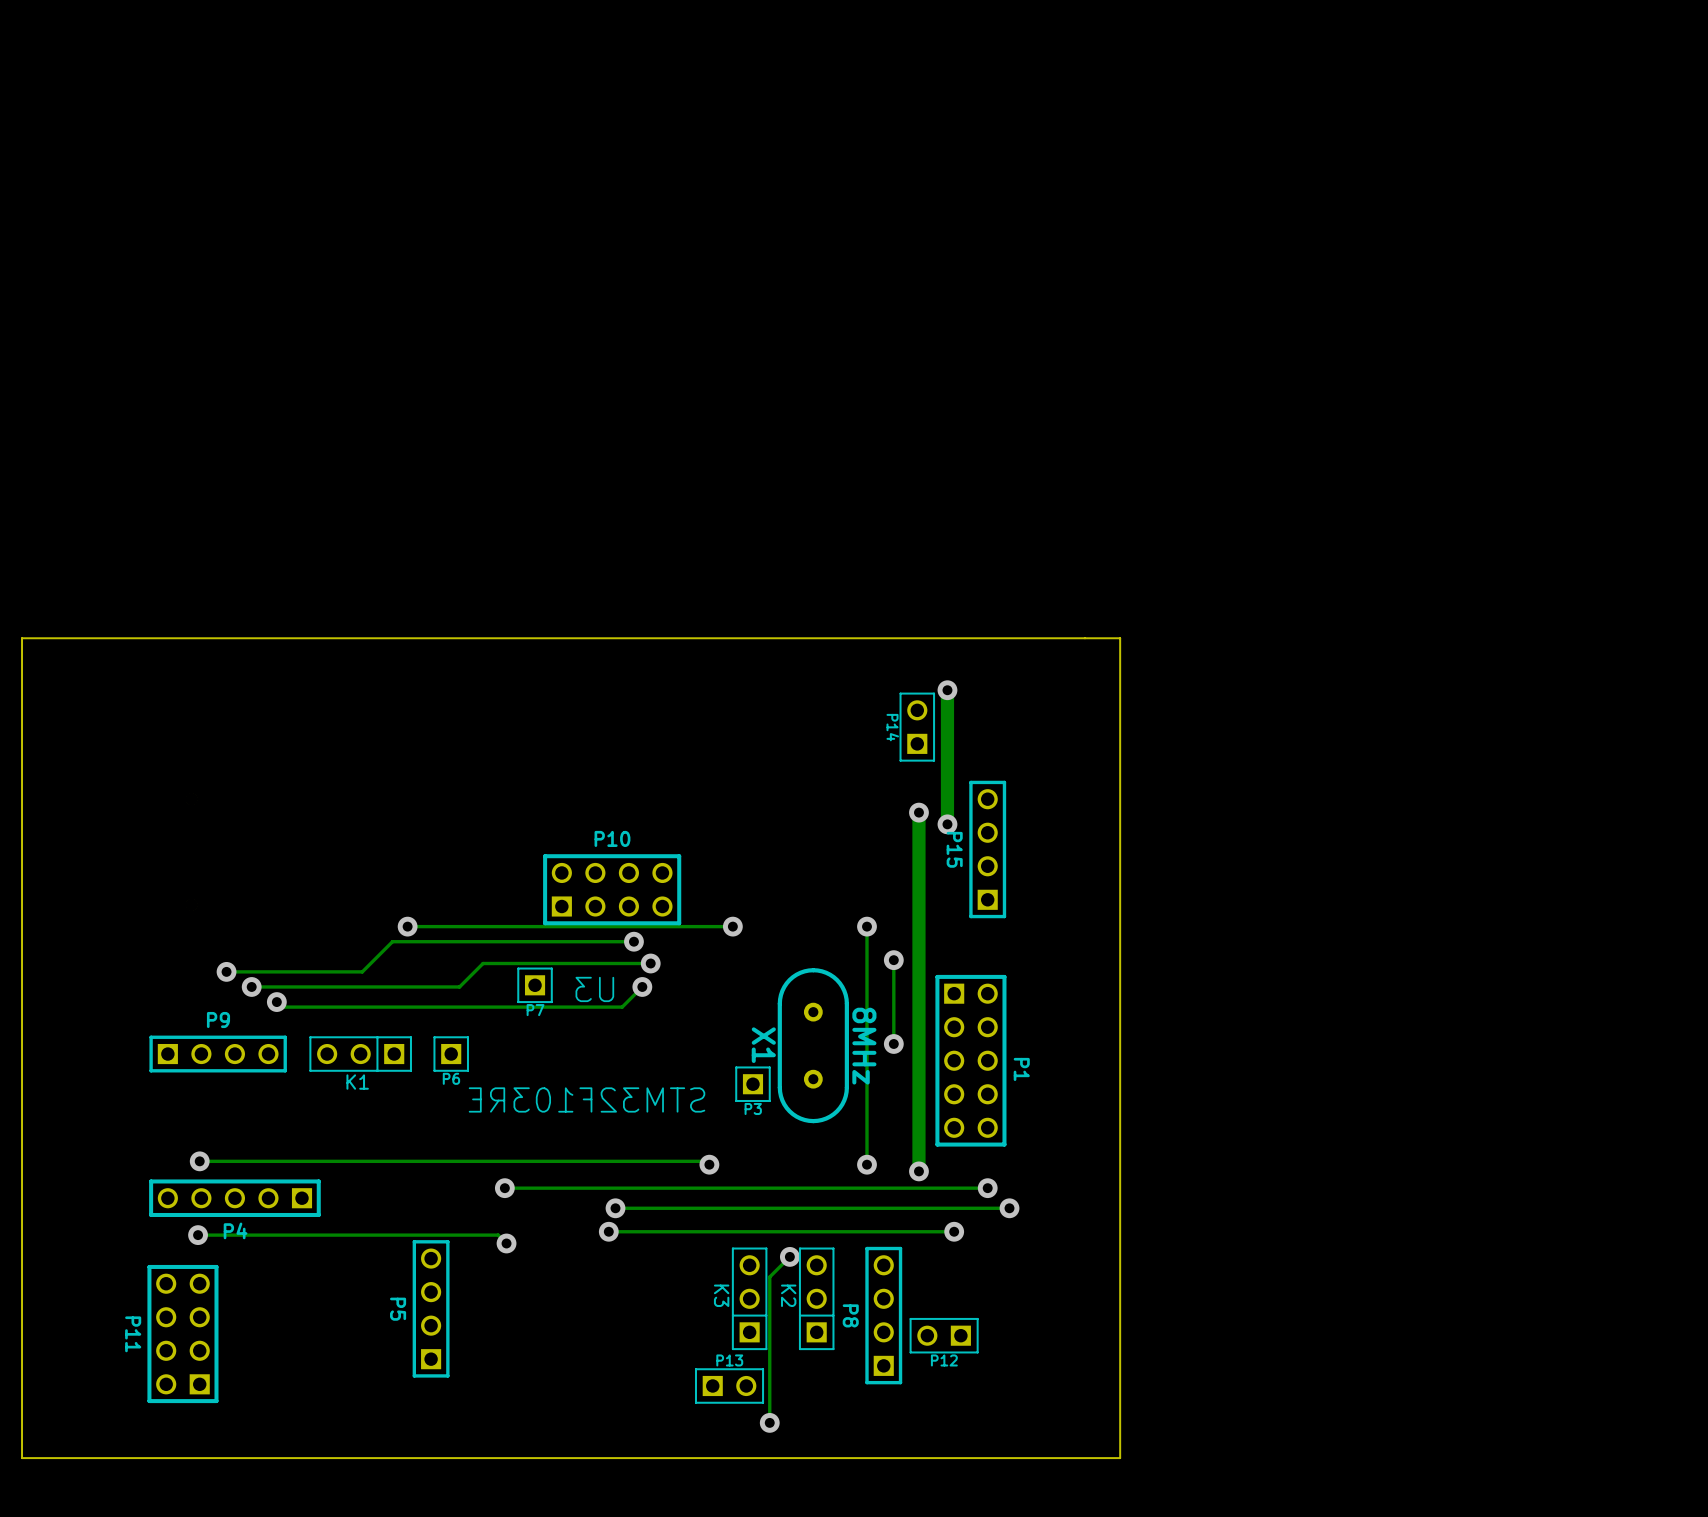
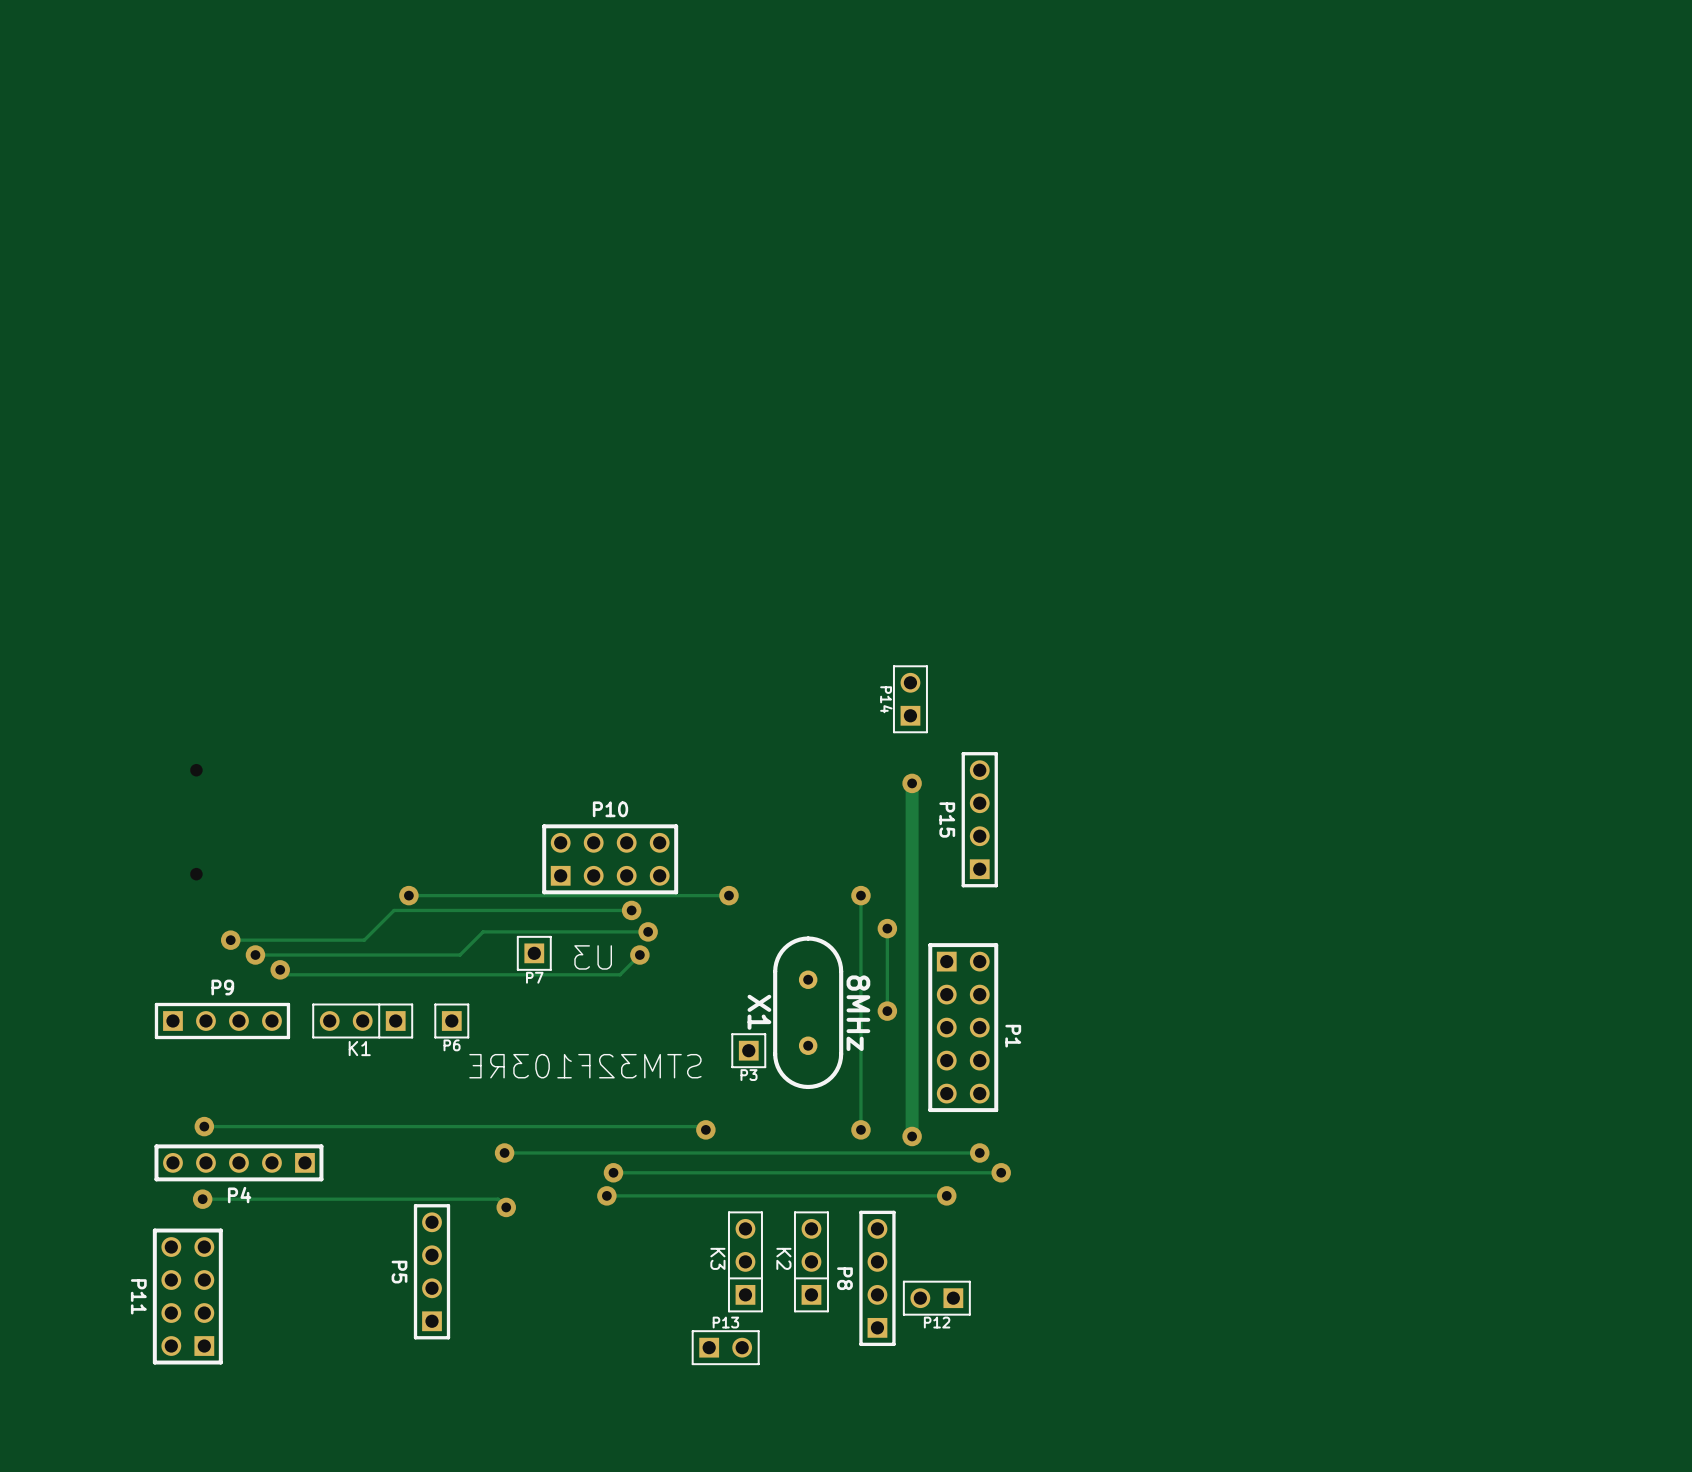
board edge: (1120, 638) (22, 638) (22, 1458) (1120, 1458) (1120, 638) -> none
track: (947, 690) (947, 824) -> none
via: (947, 690) -> none
via: (947, 824) -> none
track: (789, 1256) (769, 1277) (769, 1422) -> none
via: (789, 1256) -> none
via: (769, 1422) -> none

